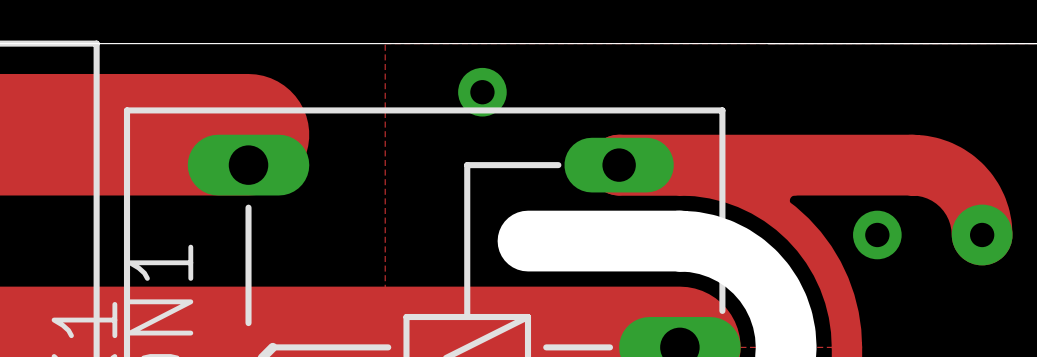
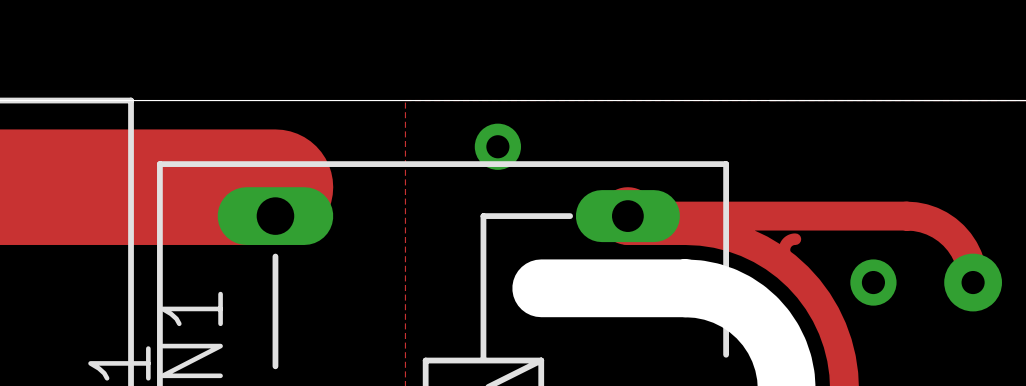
track width: thick (619, 165) (921, 165) (939, 170) (961, 185) (976, 208) (982, 234) -> thin (627, 216) (915, 216) (932, 221) (953, 235) (968, 257) (973, 282)

